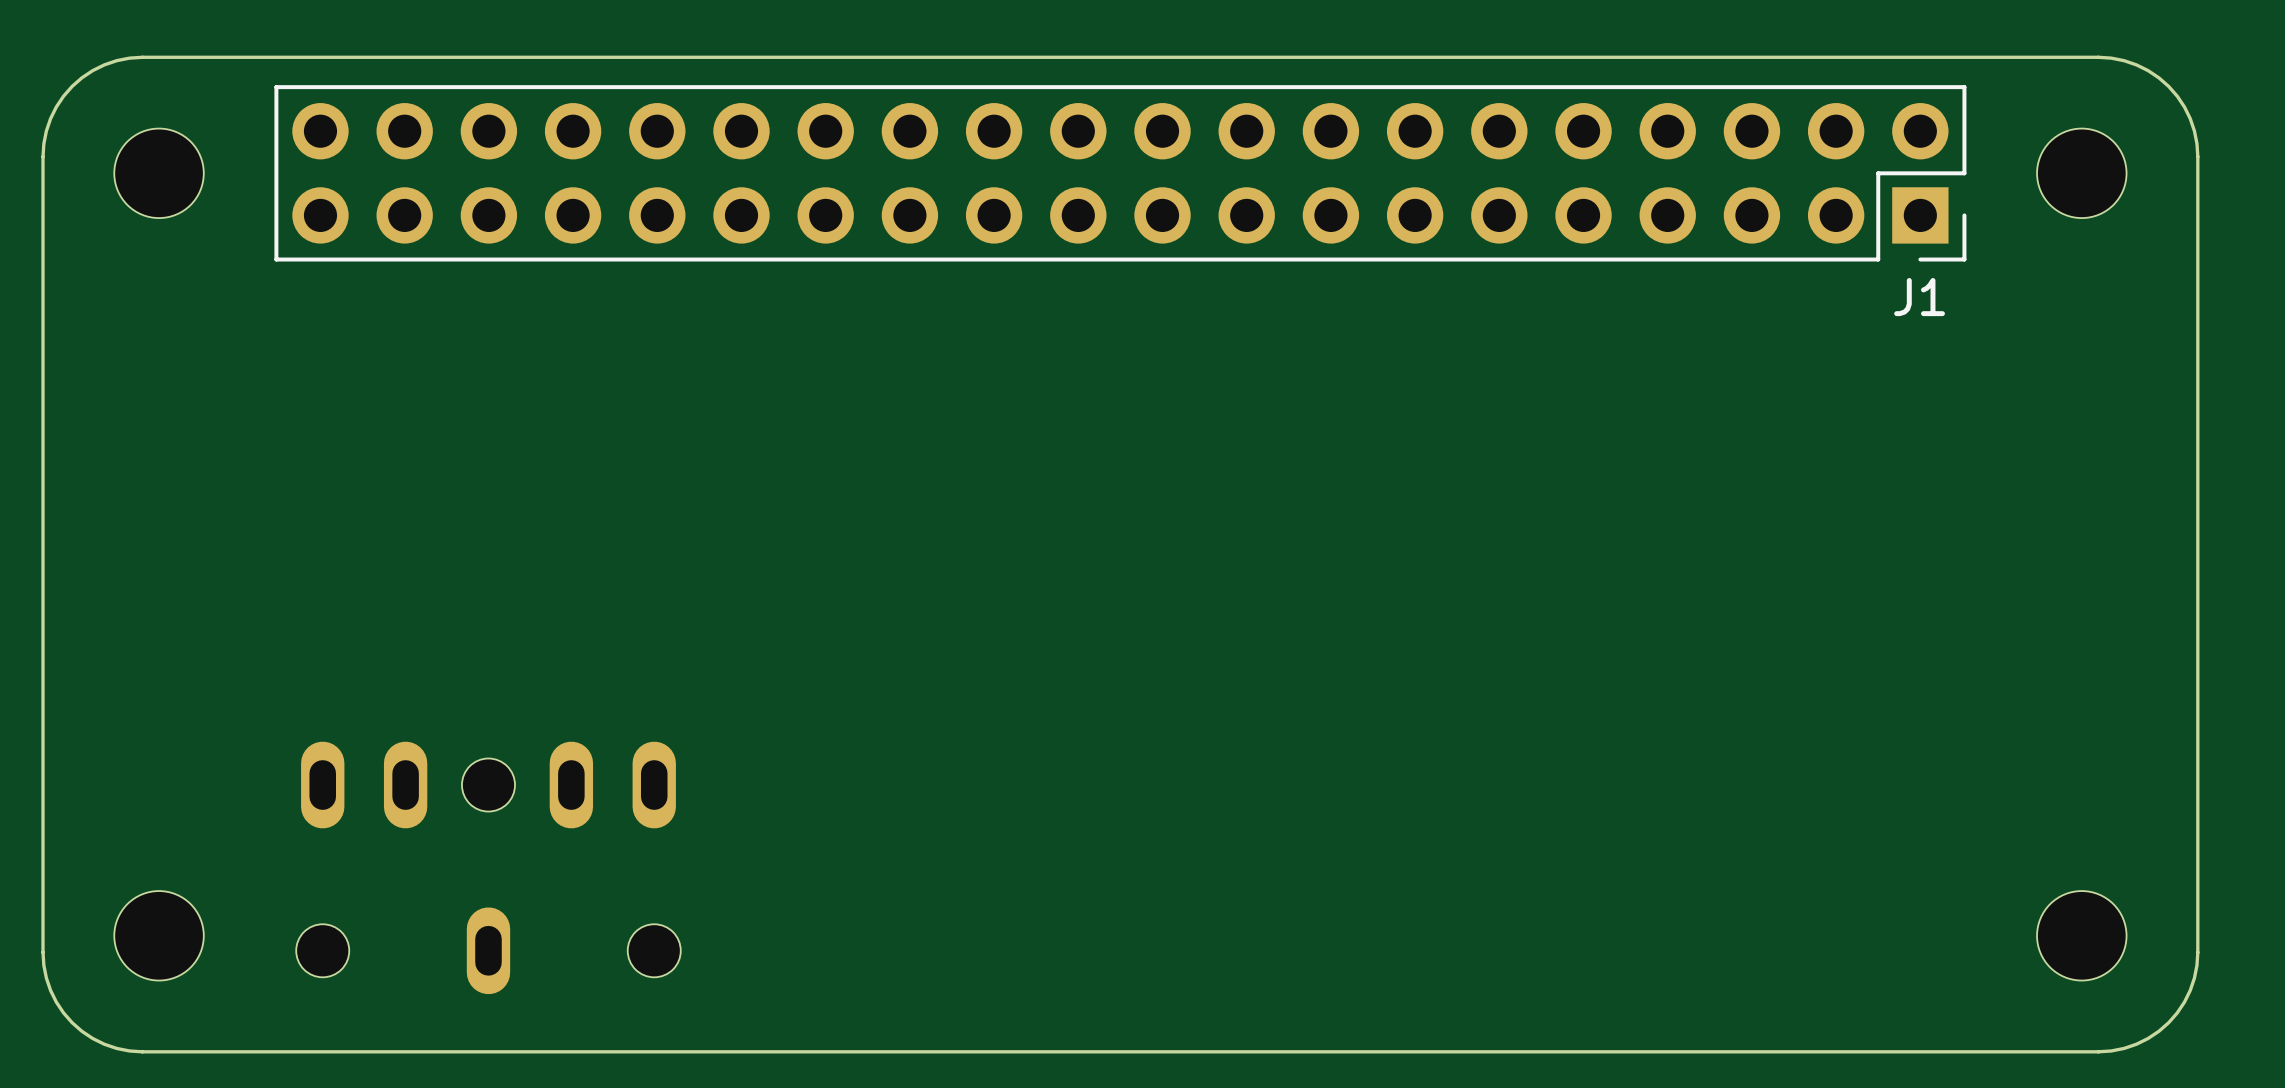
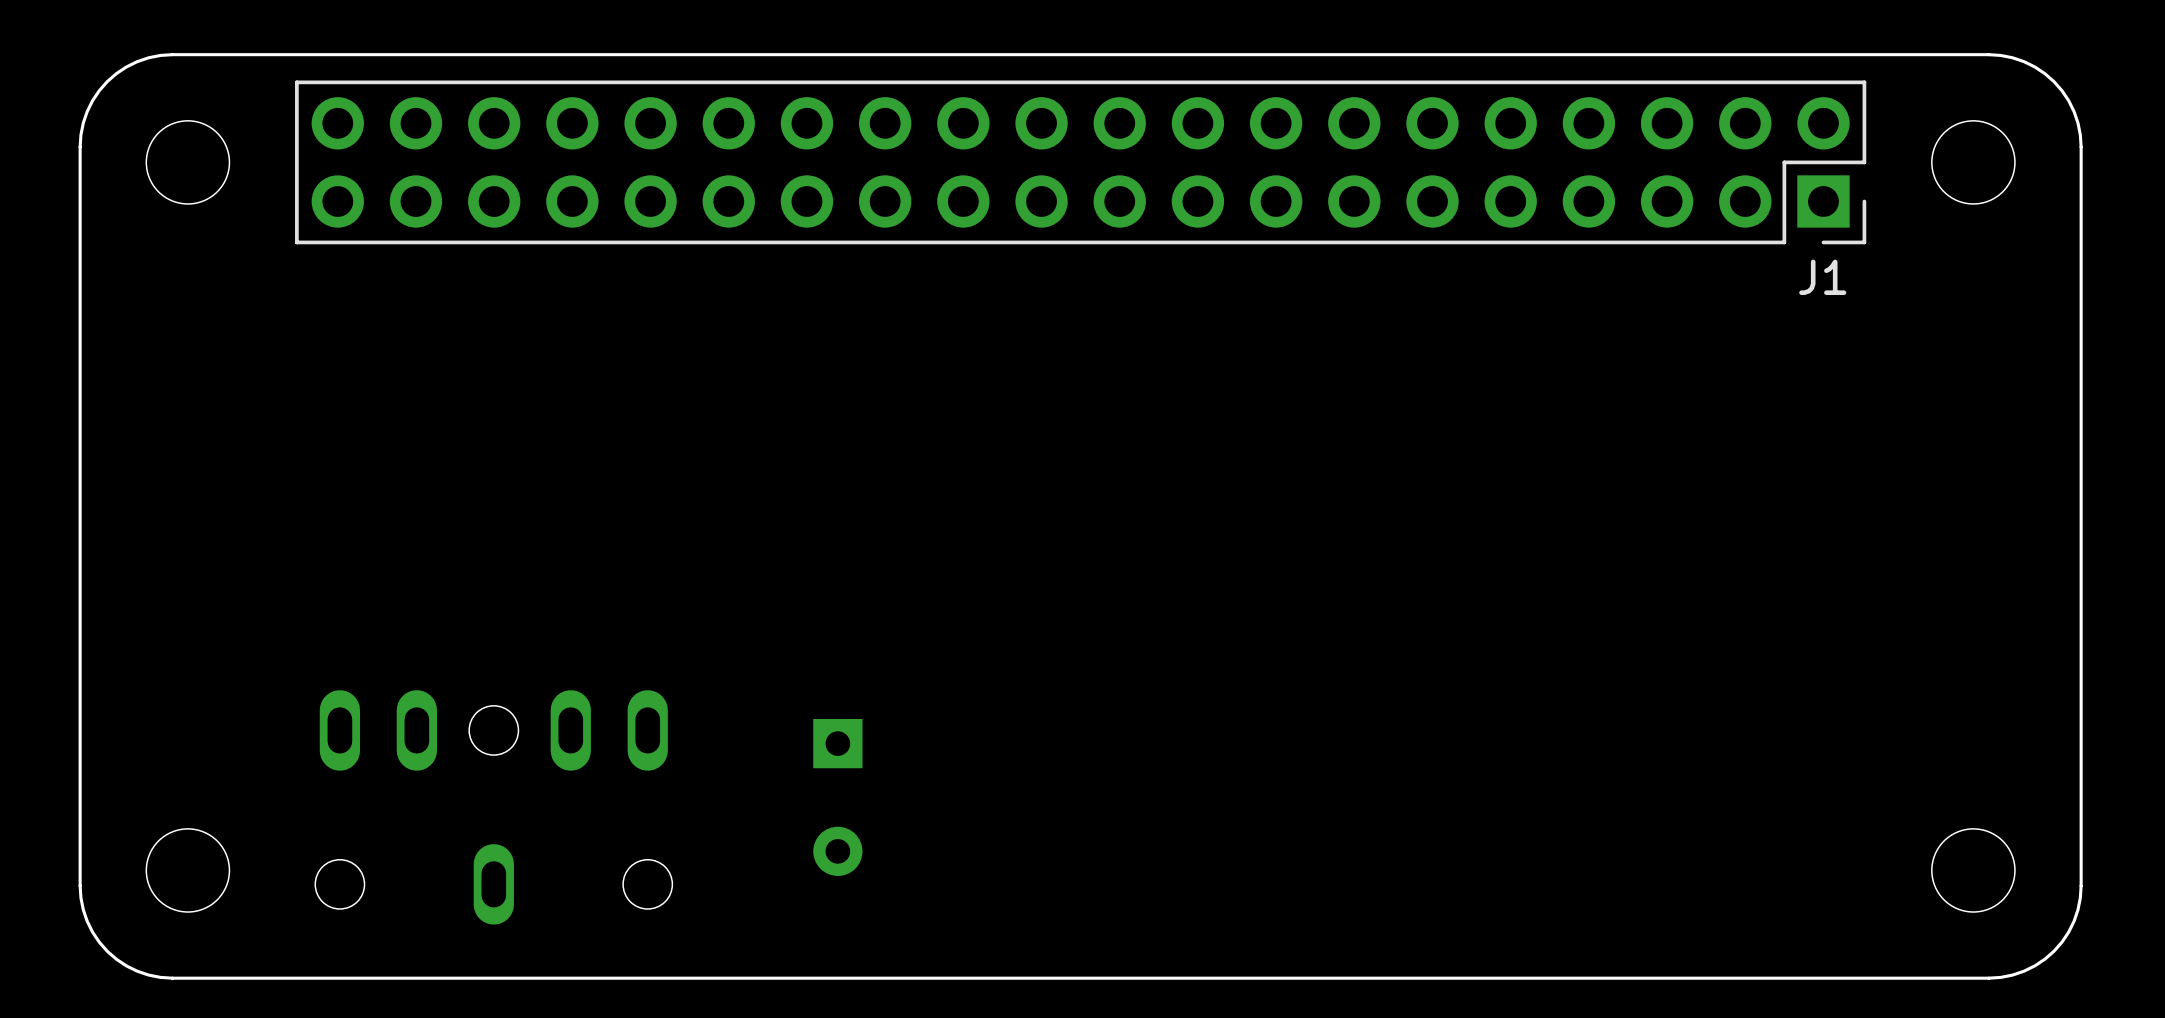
part: none -> (837, 797)

